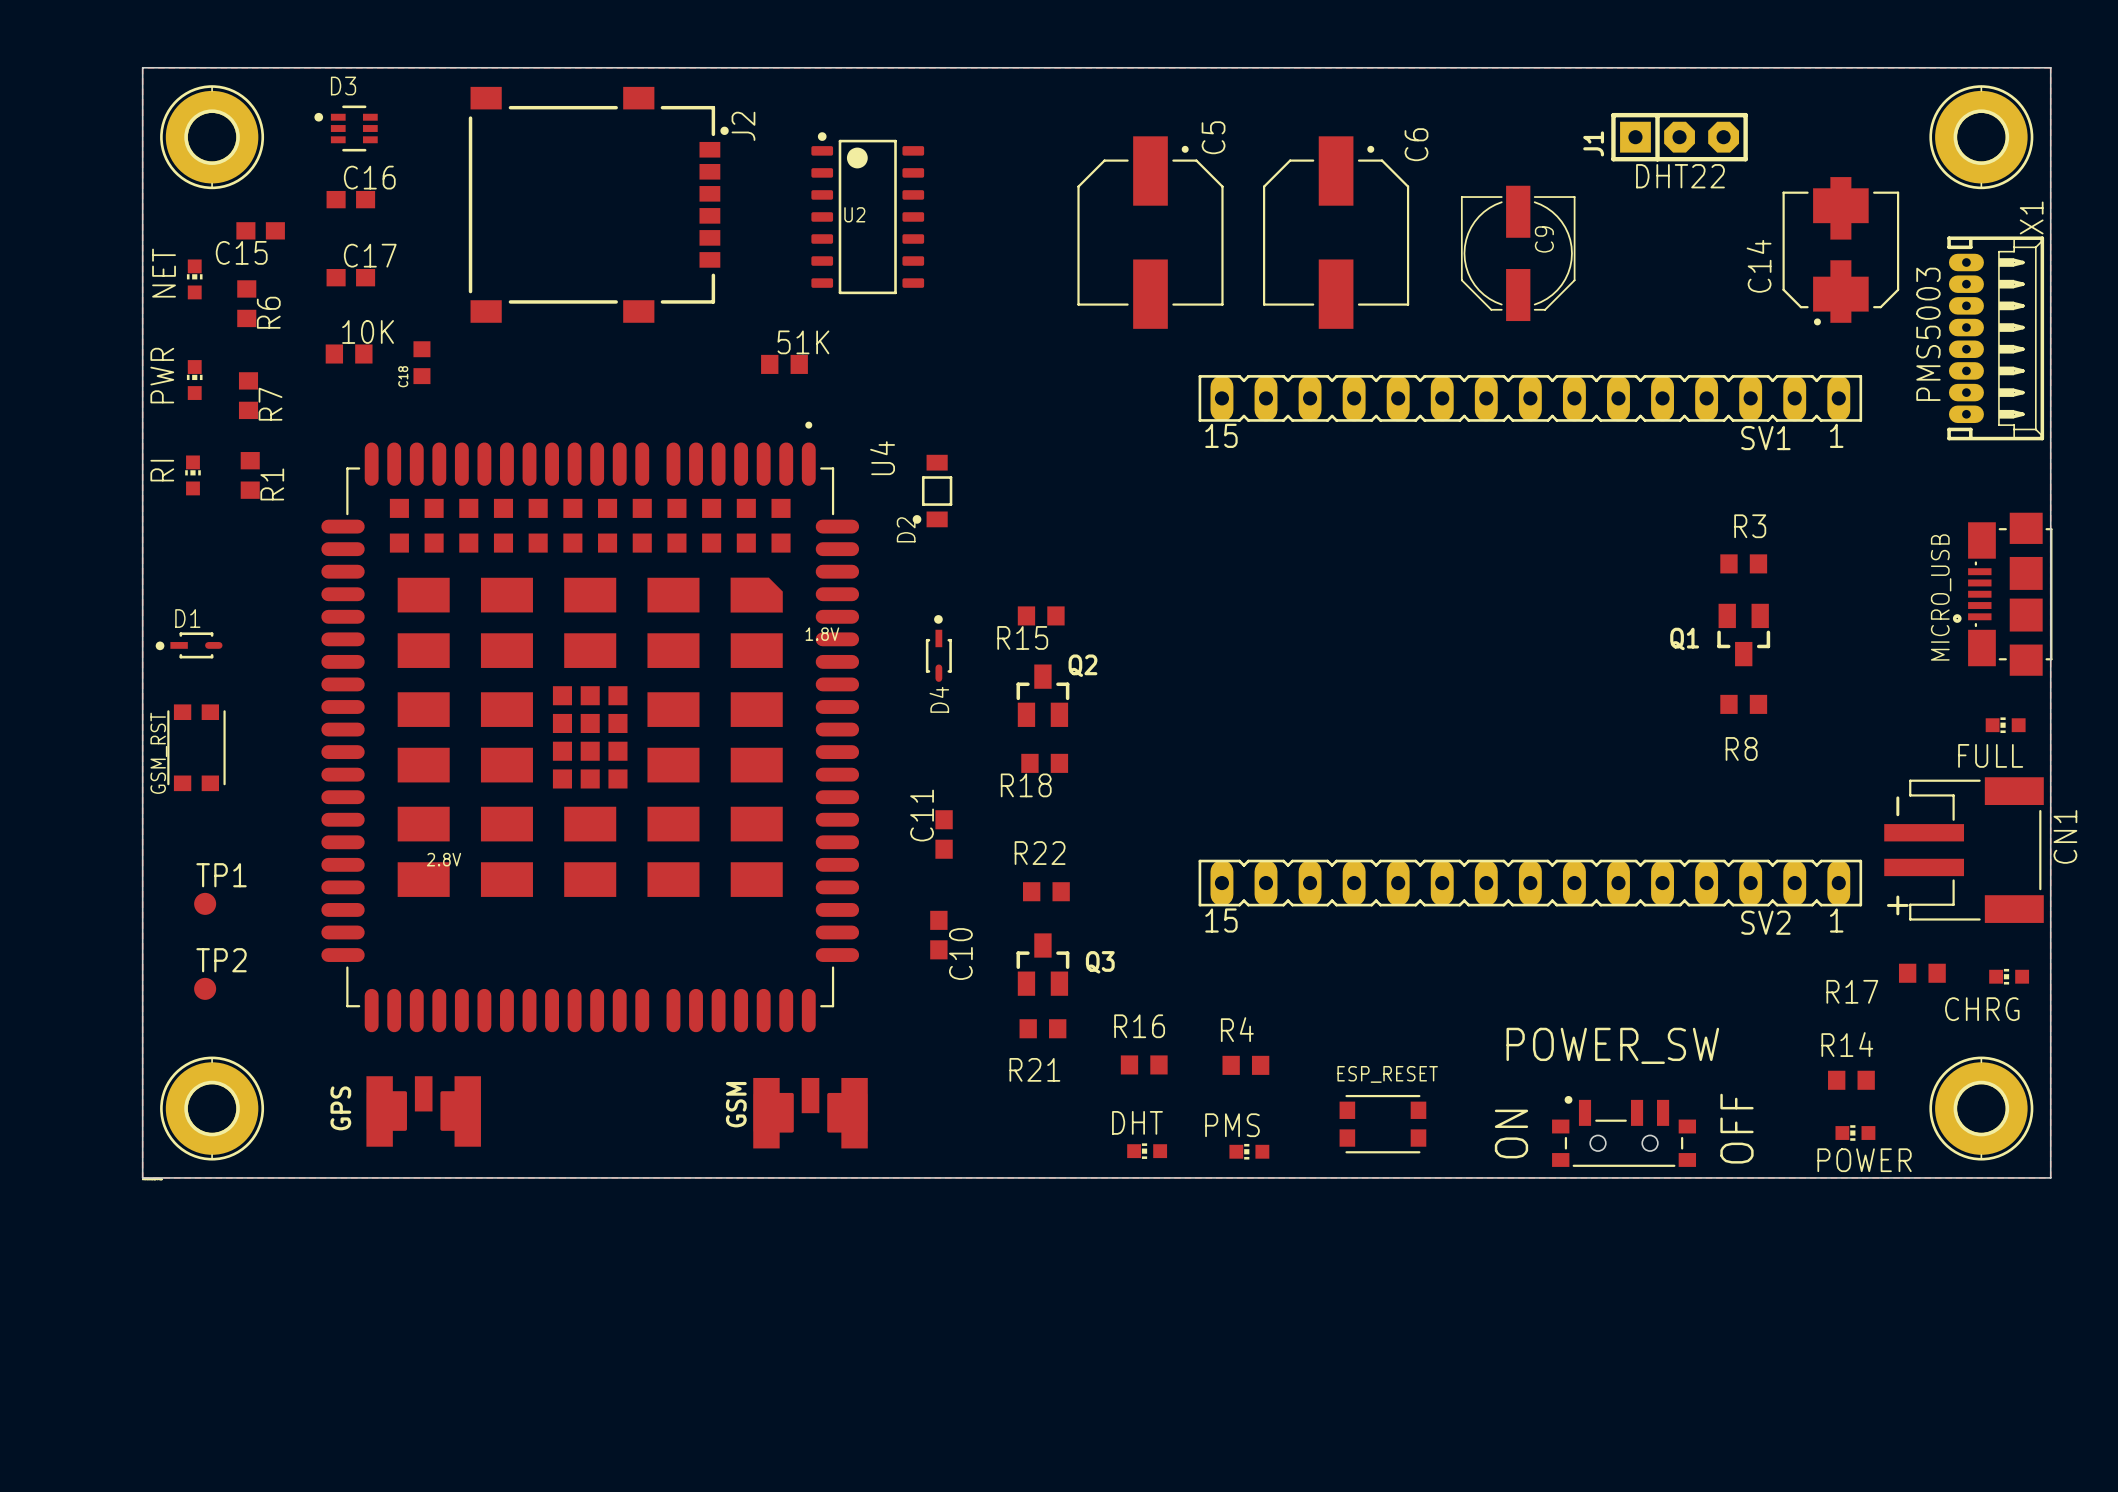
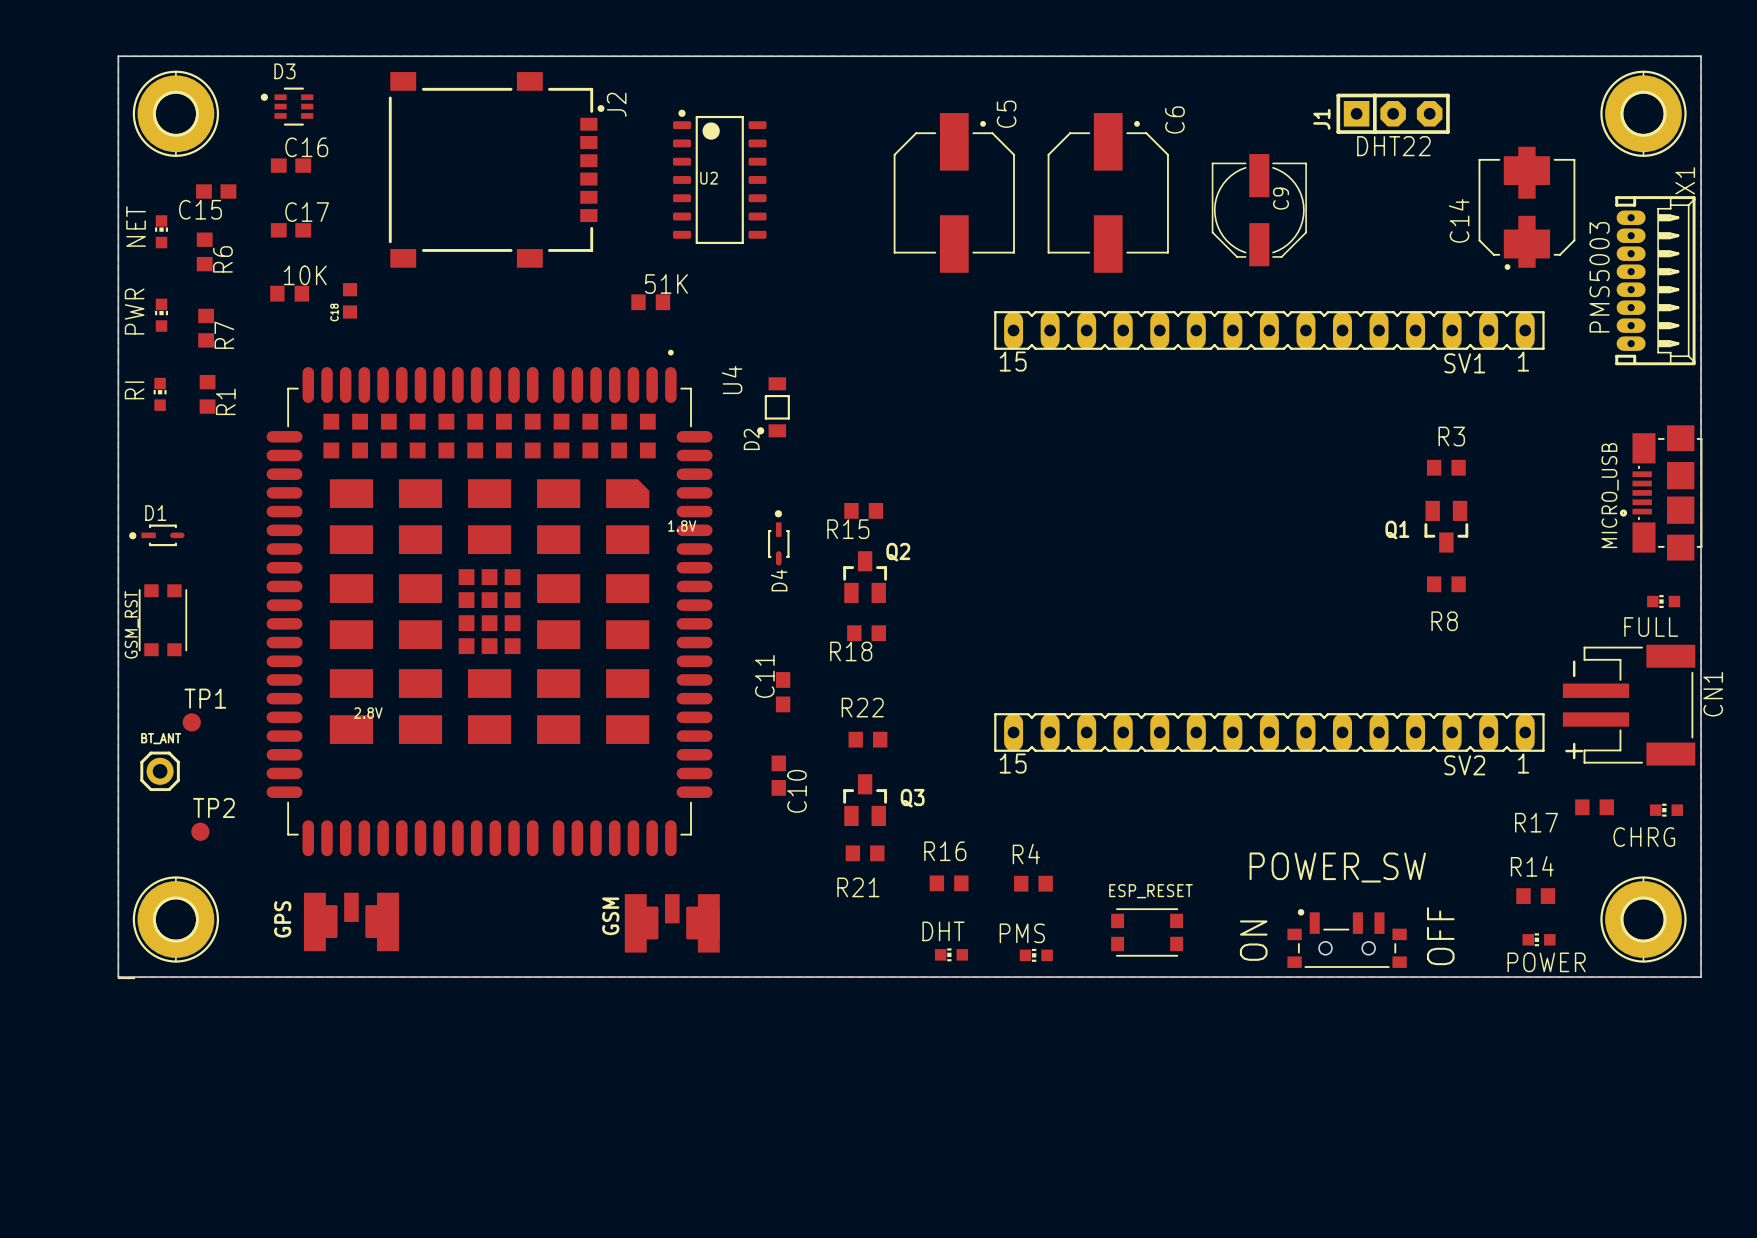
TP1 position: (205, 903) -> (191, 722)
BT_ANT: none -> (160, 771)
TP2 position: (205, 988) -> (200, 831)

